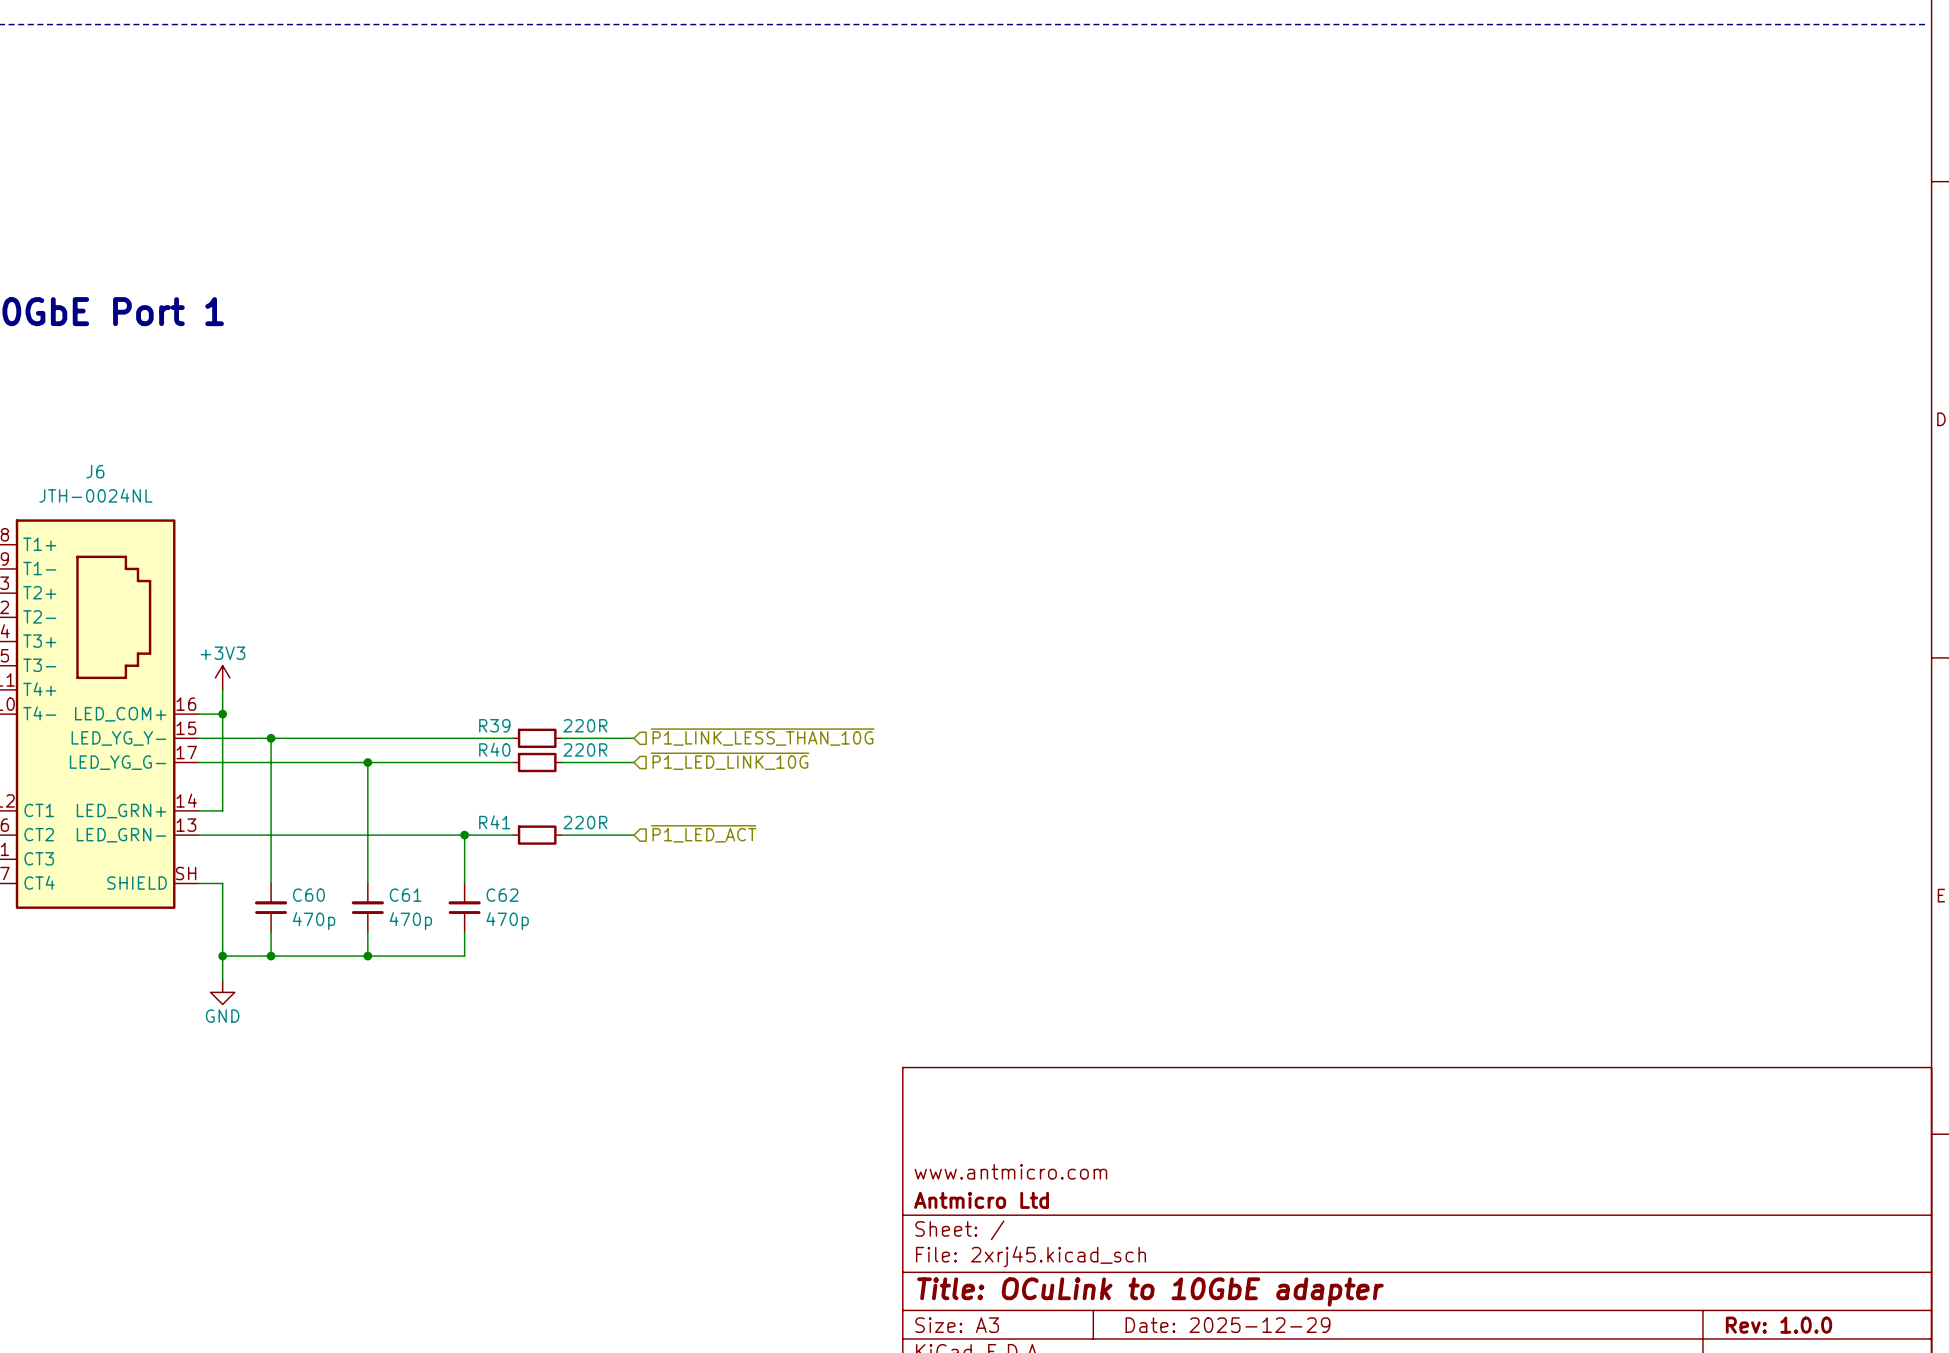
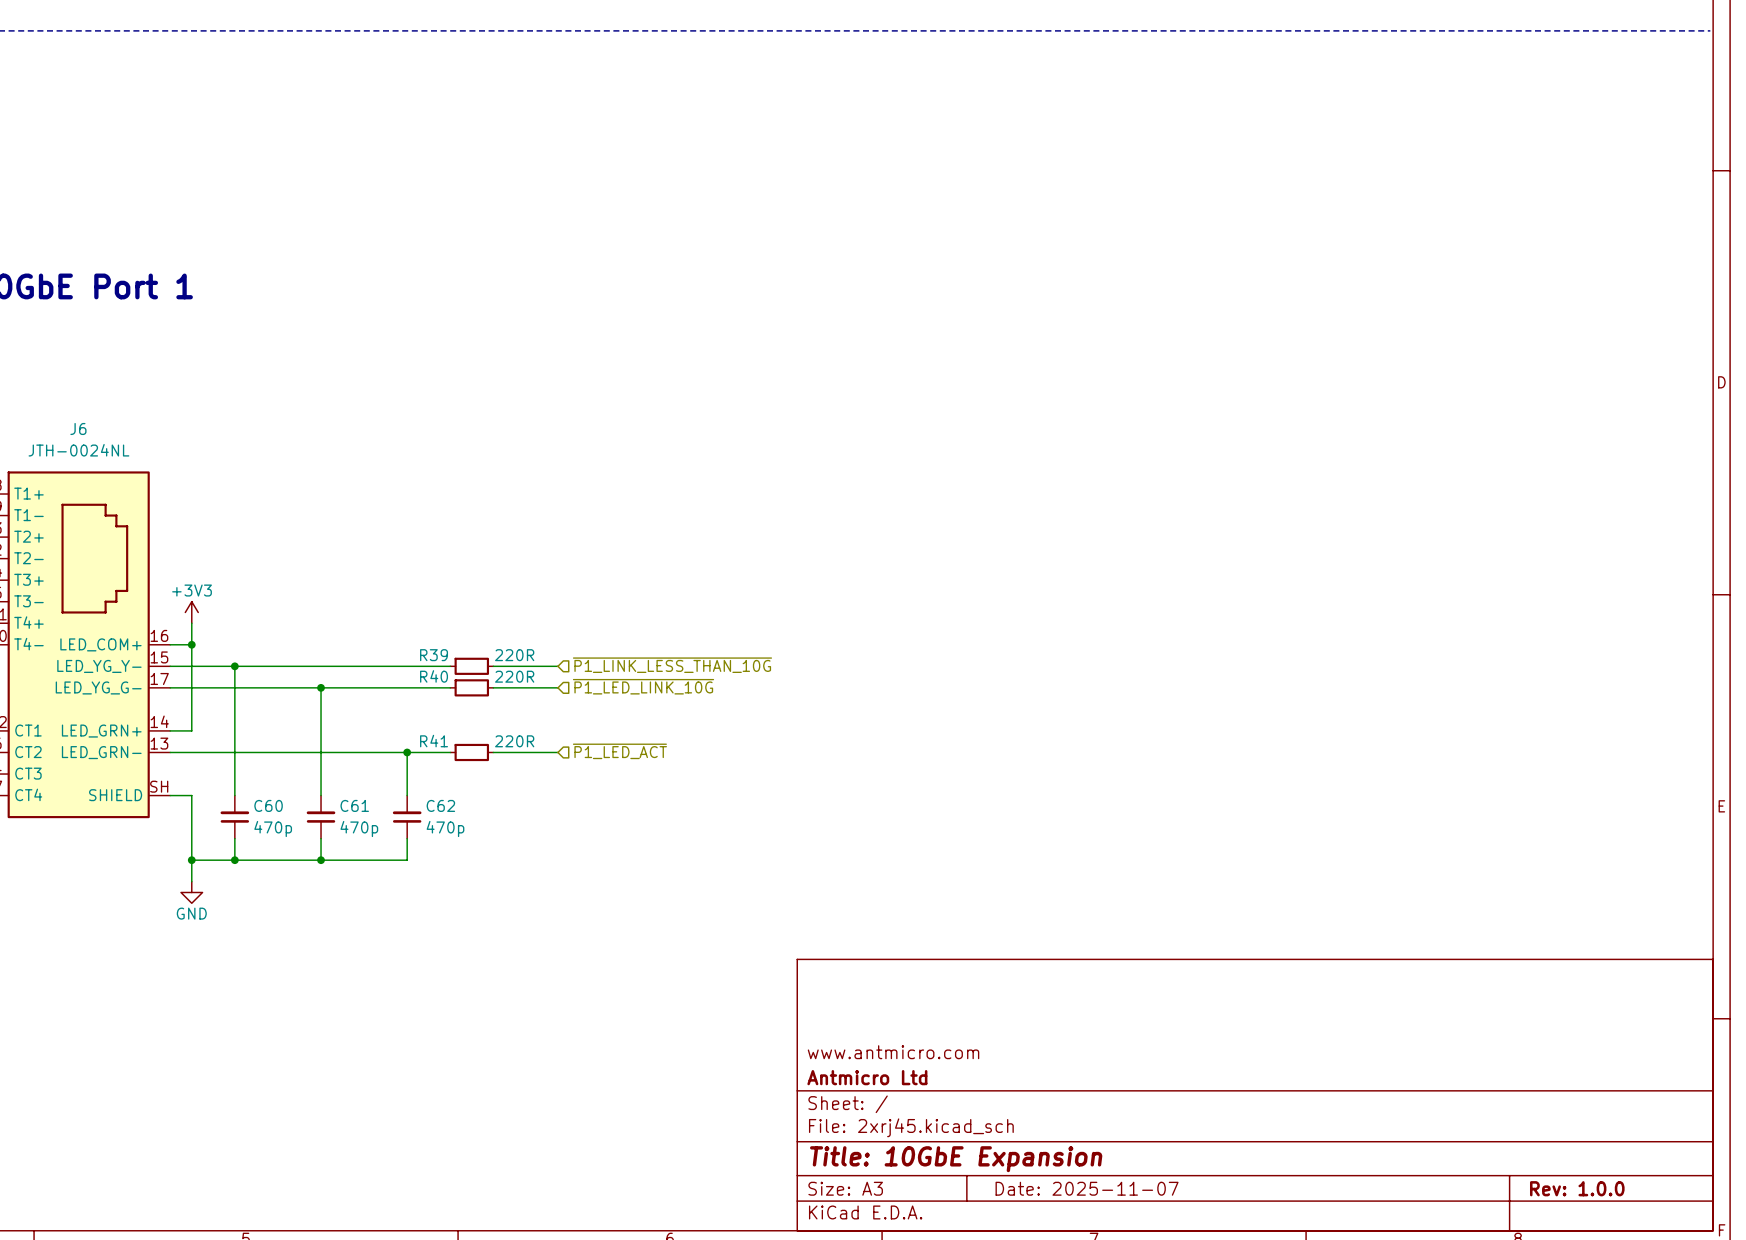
title block: Title: OCuLink to 10GbE adapter (1150, 1291) -> Title: 10GbE Expansion (956, 1159)
title block: Date: 2025-12-29 (1227, 1325) -> Date: 2025-11-07 (1087, 1188)

